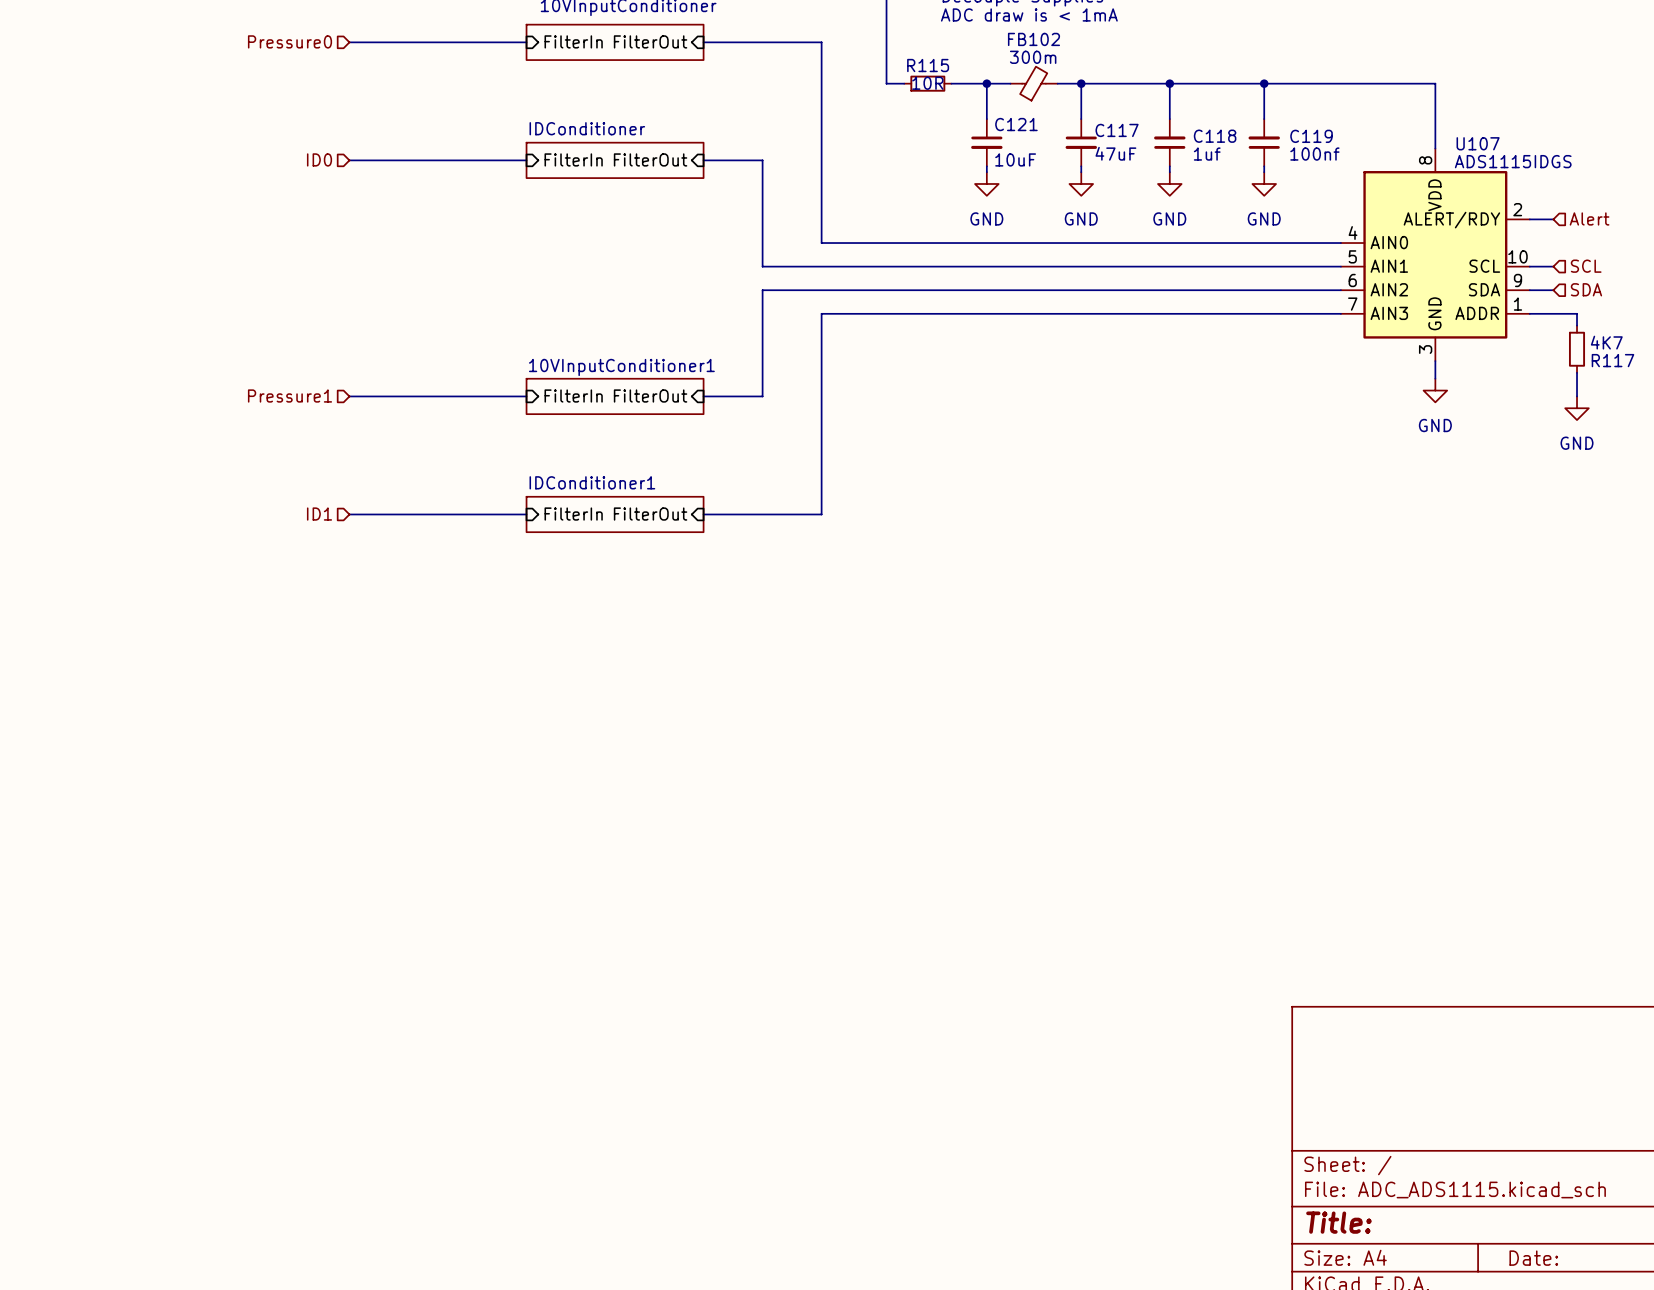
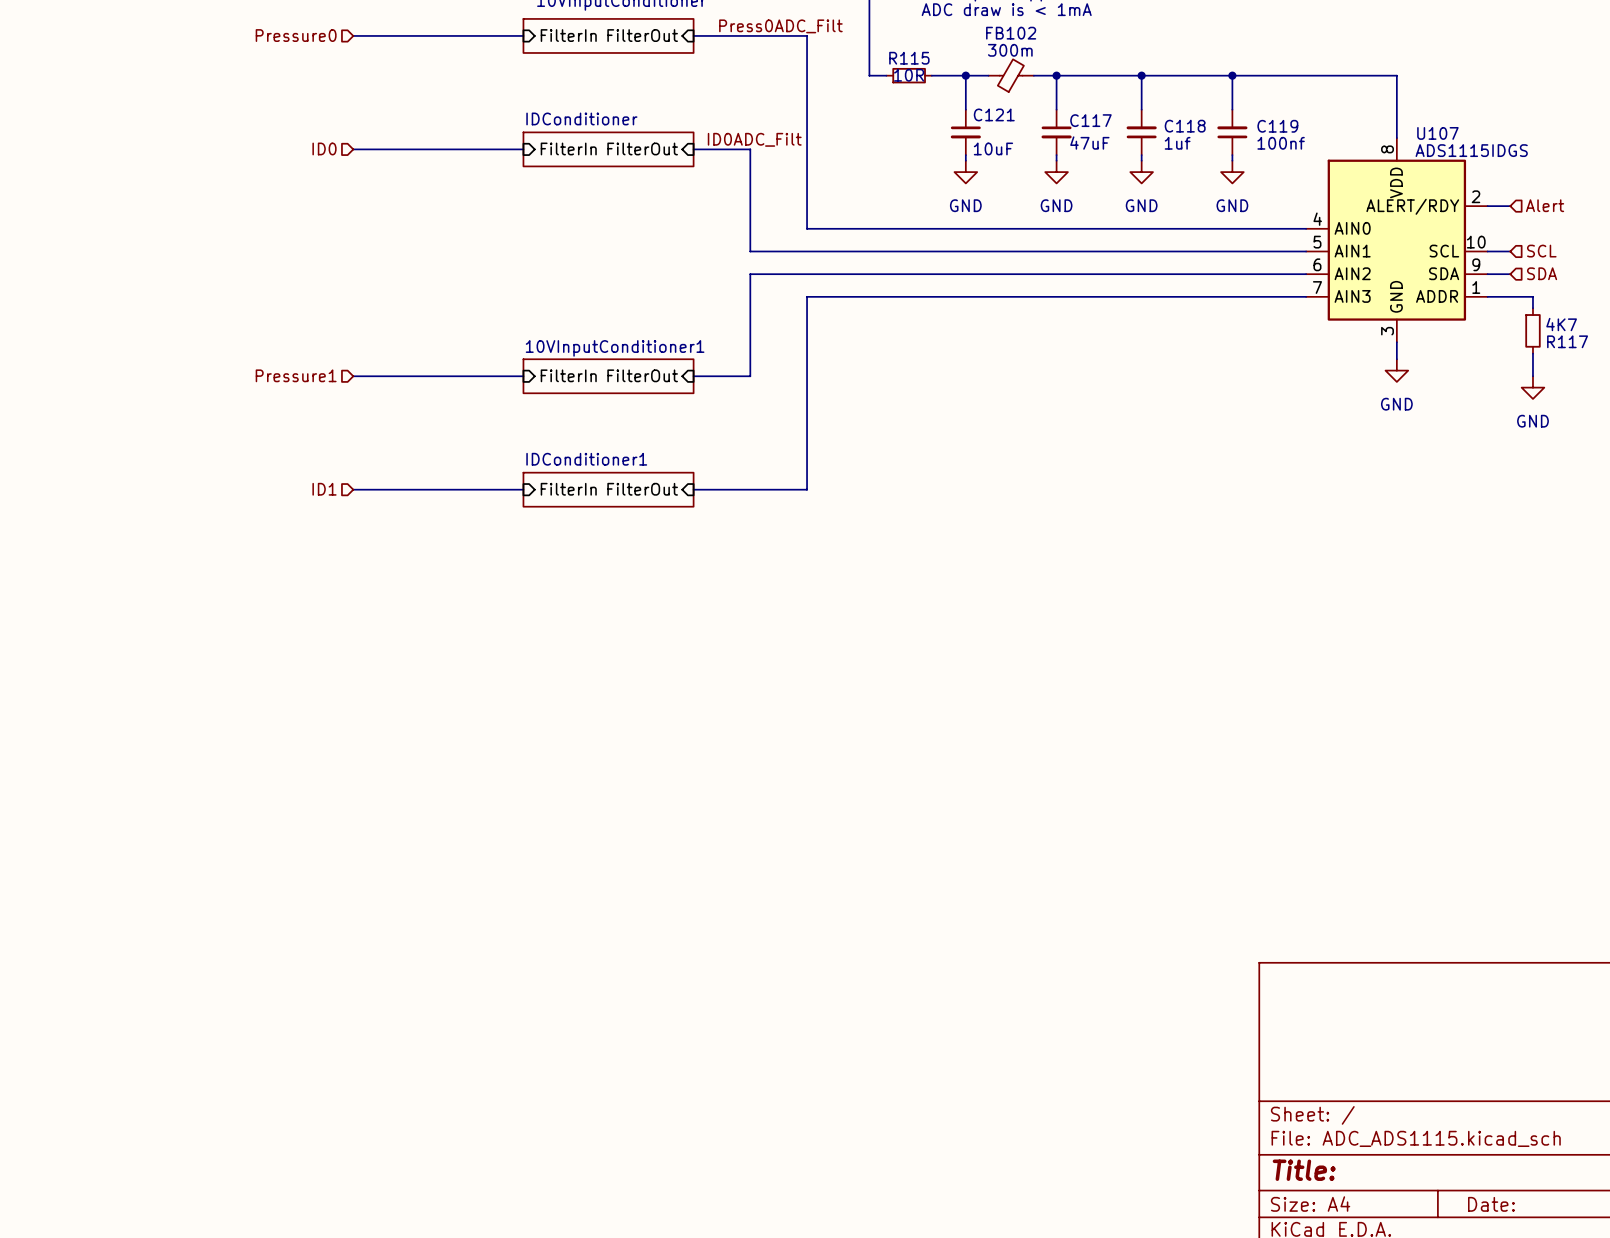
label: none -> Press0ADC_Filt (780, 26)
label: none -> ID0ADC_Filt (754, 139)

